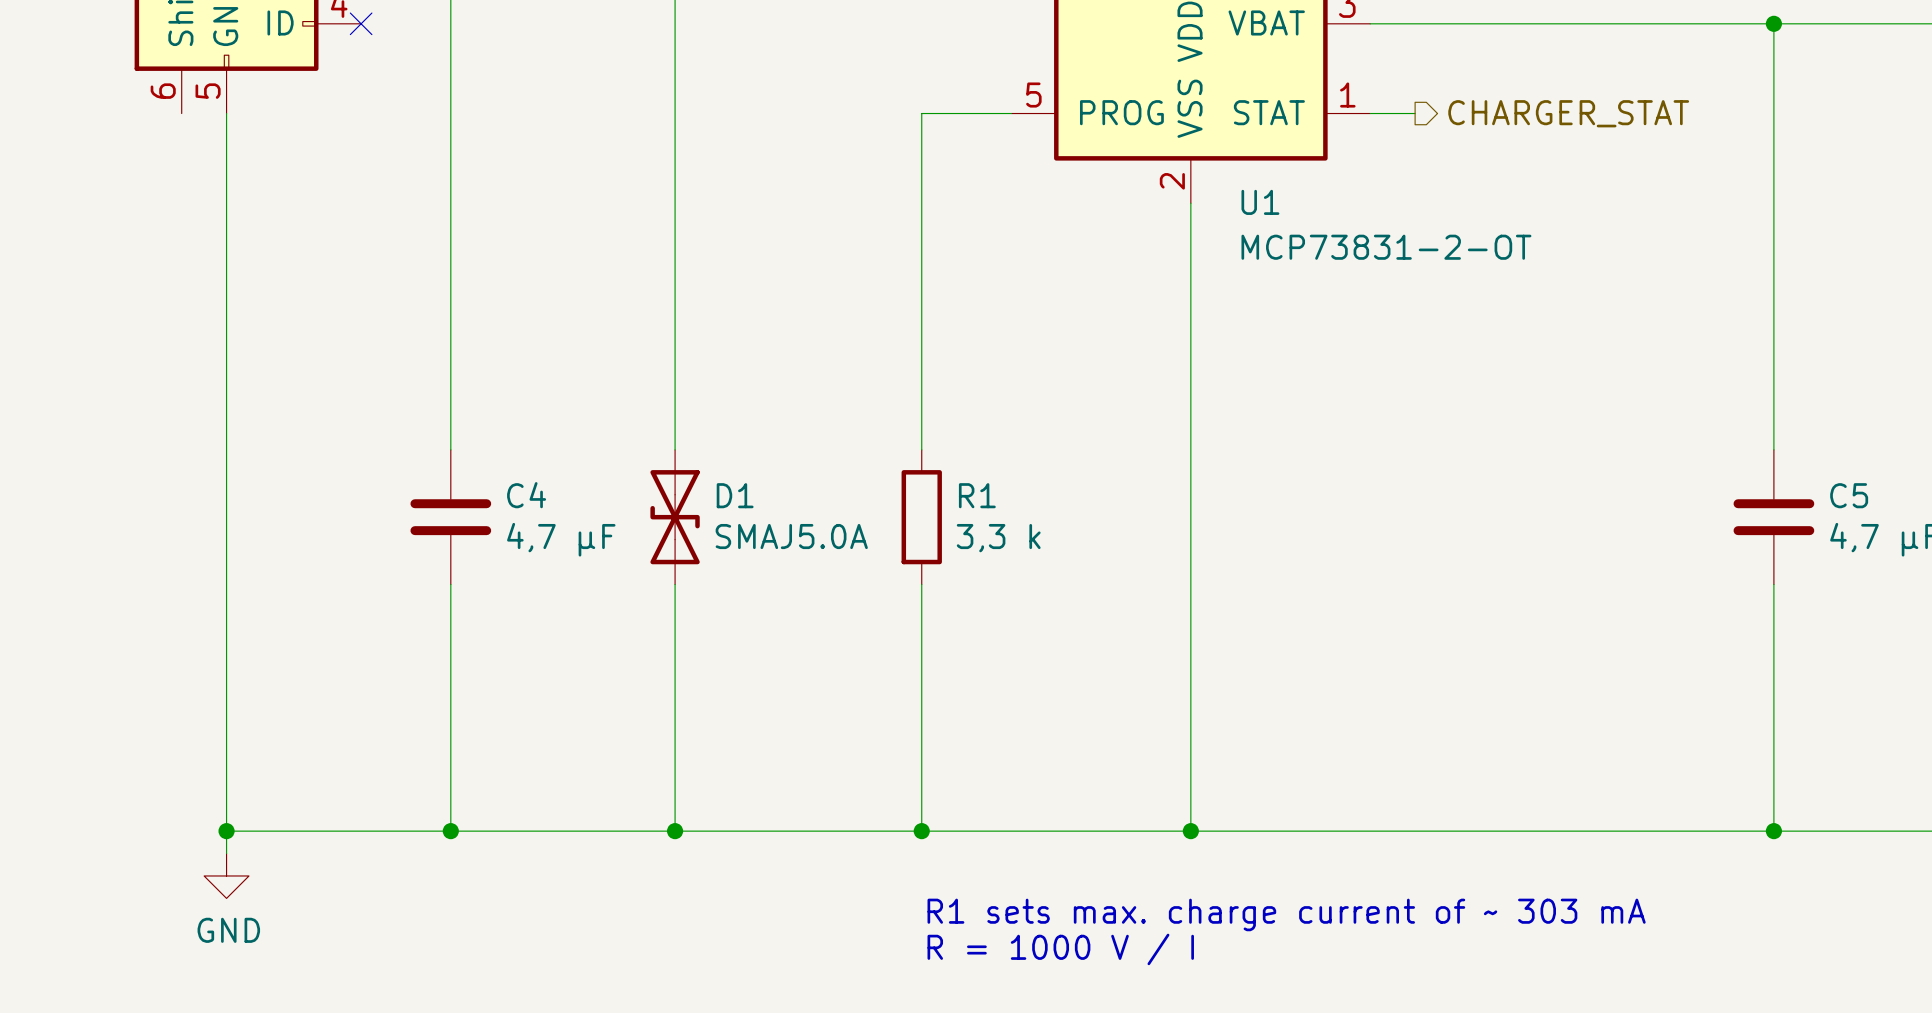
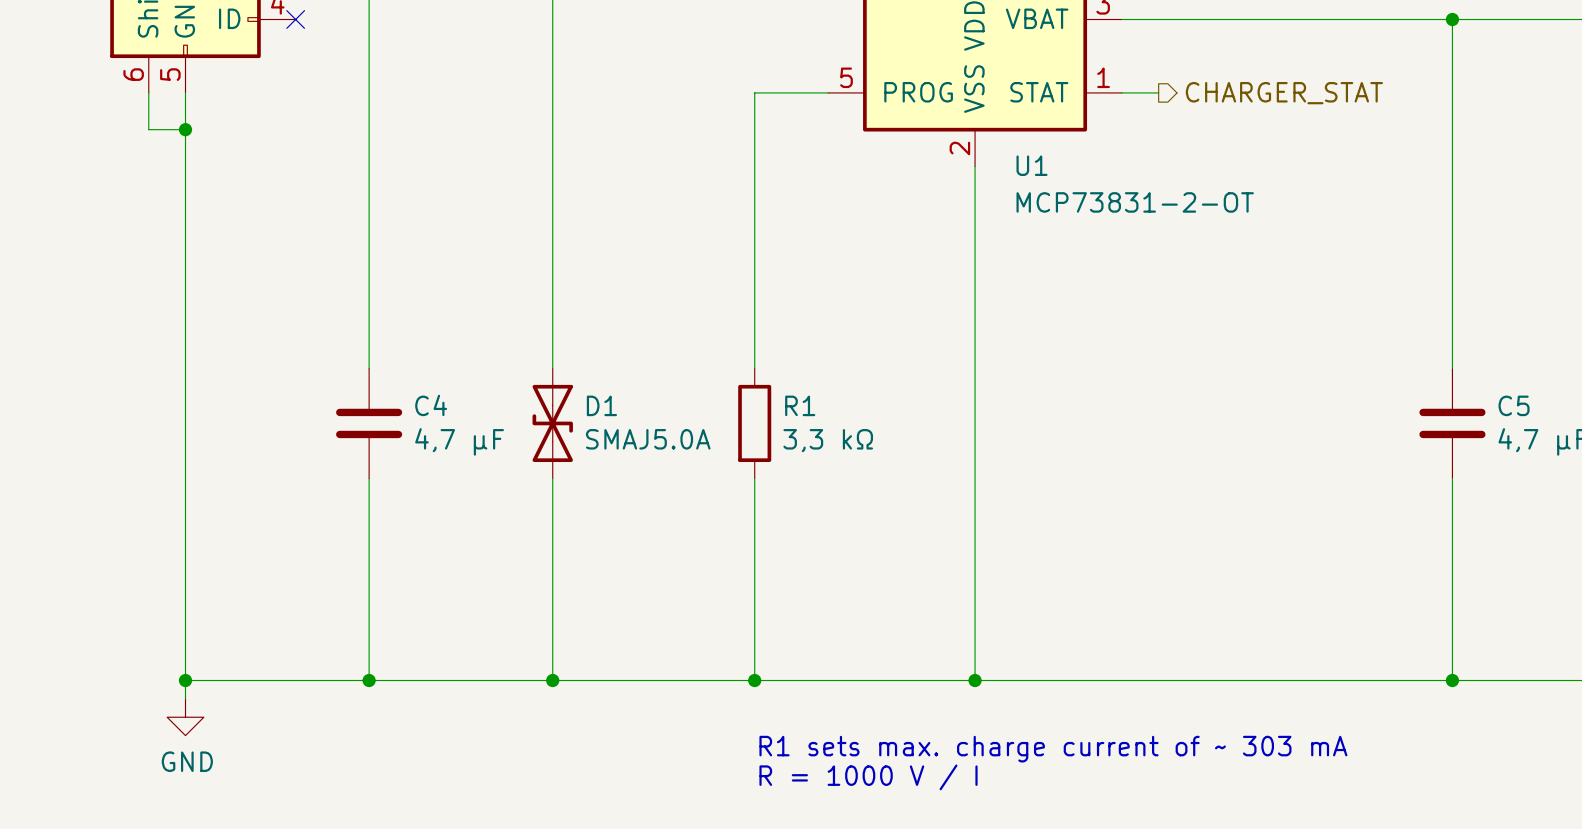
wire: none -> (148, 92) (148, 129) (185, 129)
junction: none -> (185, 129)
R1 value: 3,3 k (998, 538) -> 3,3 kΩ (828, 440)

